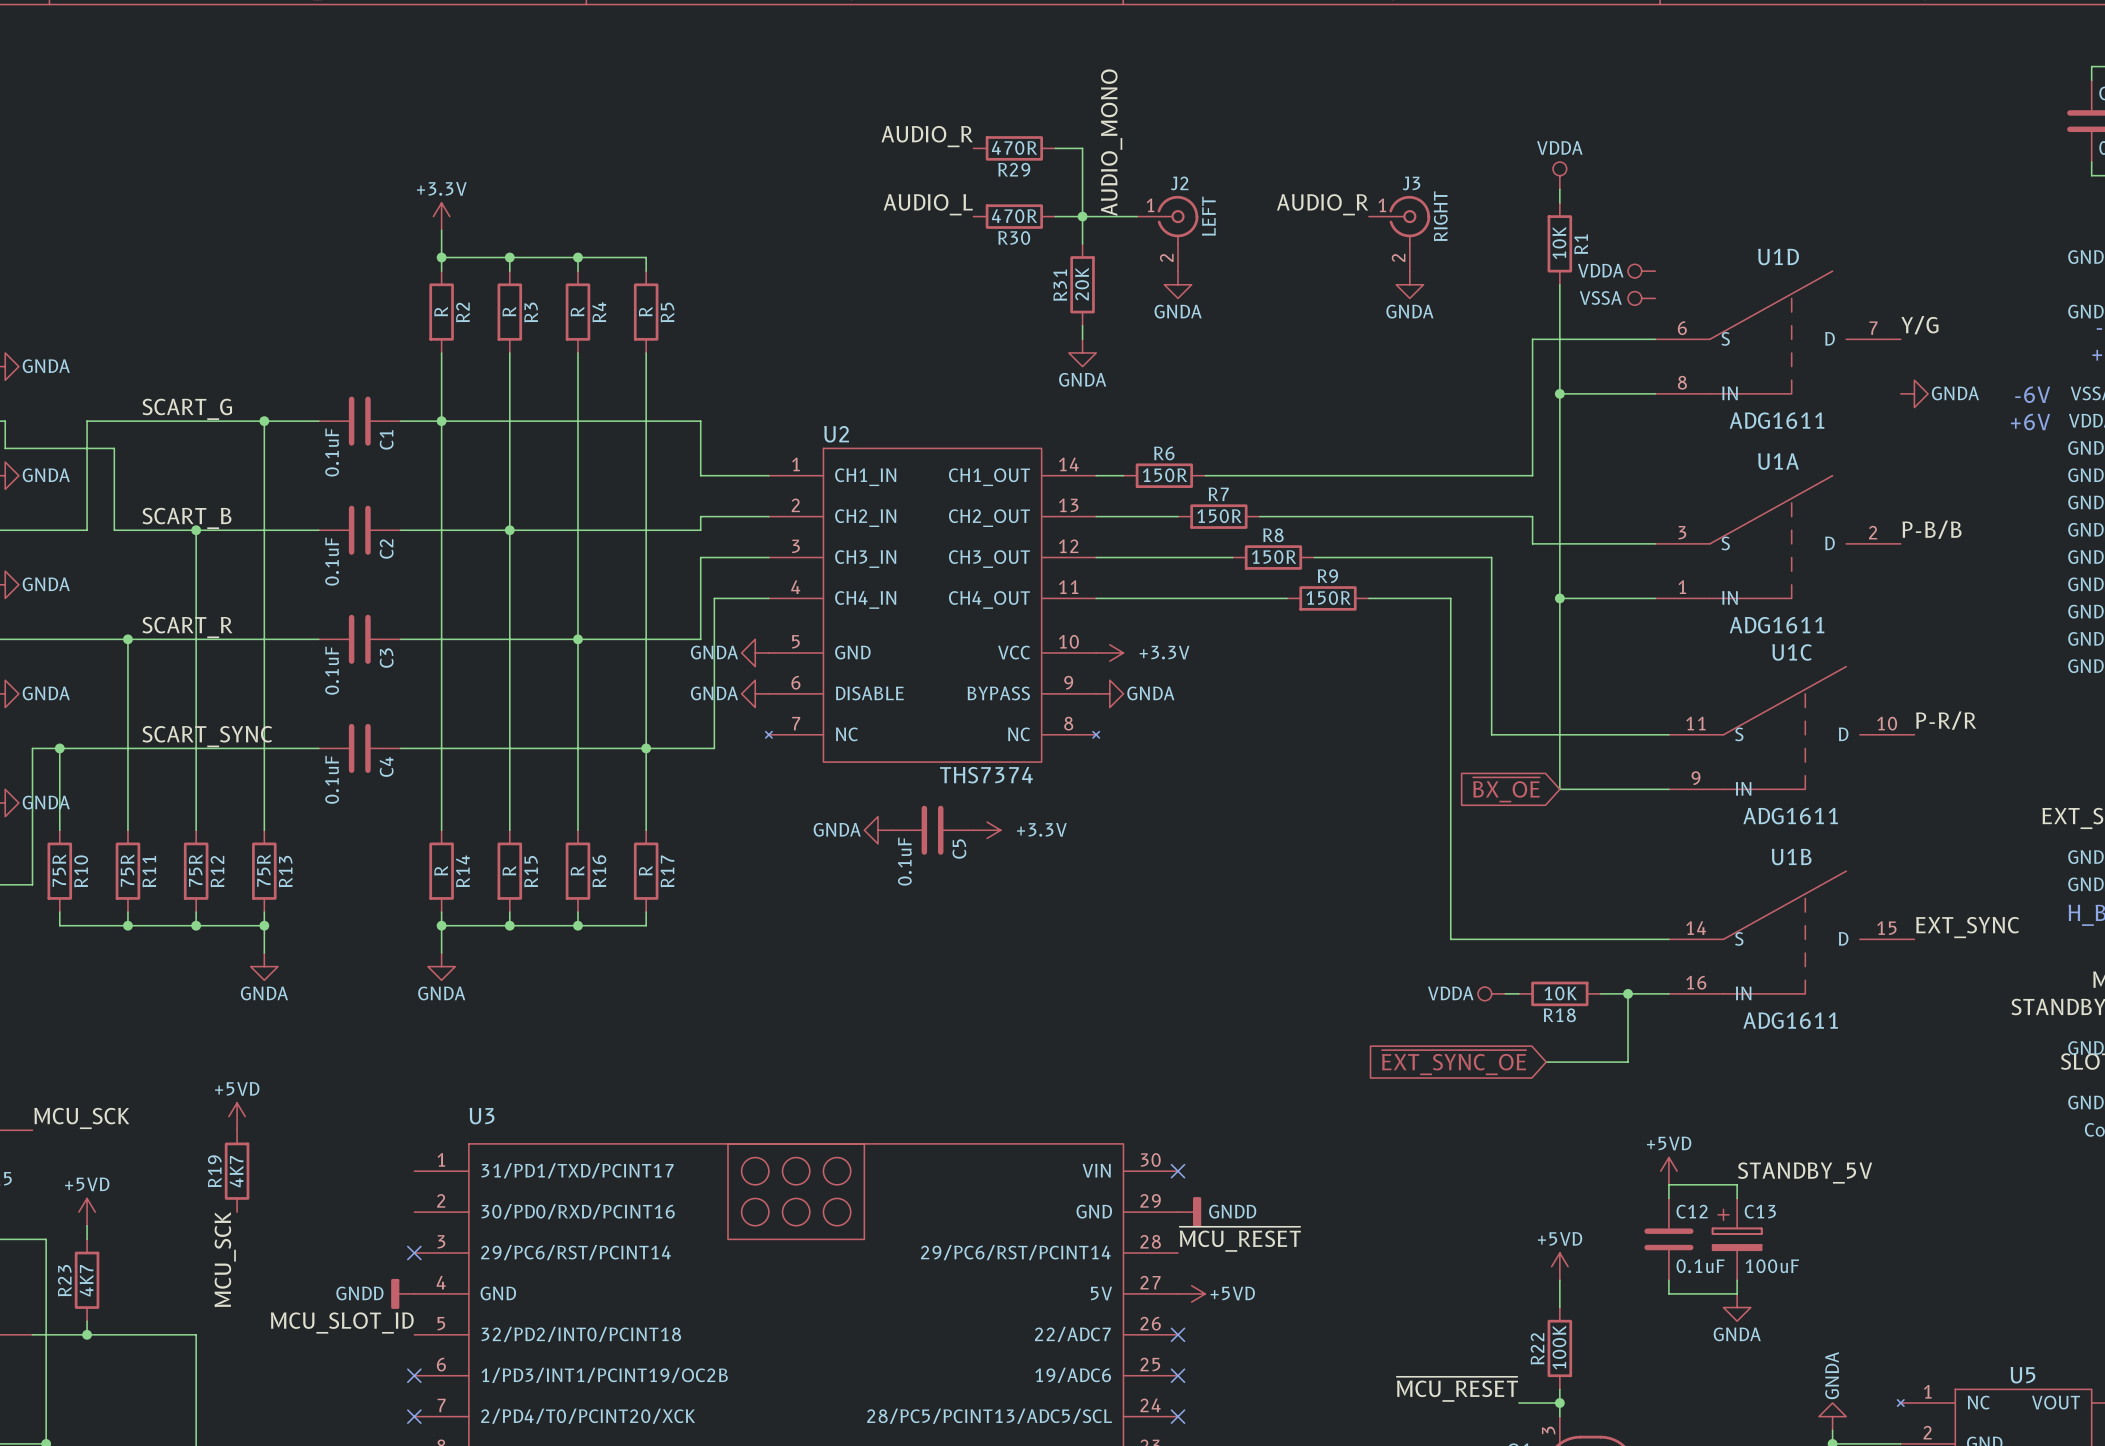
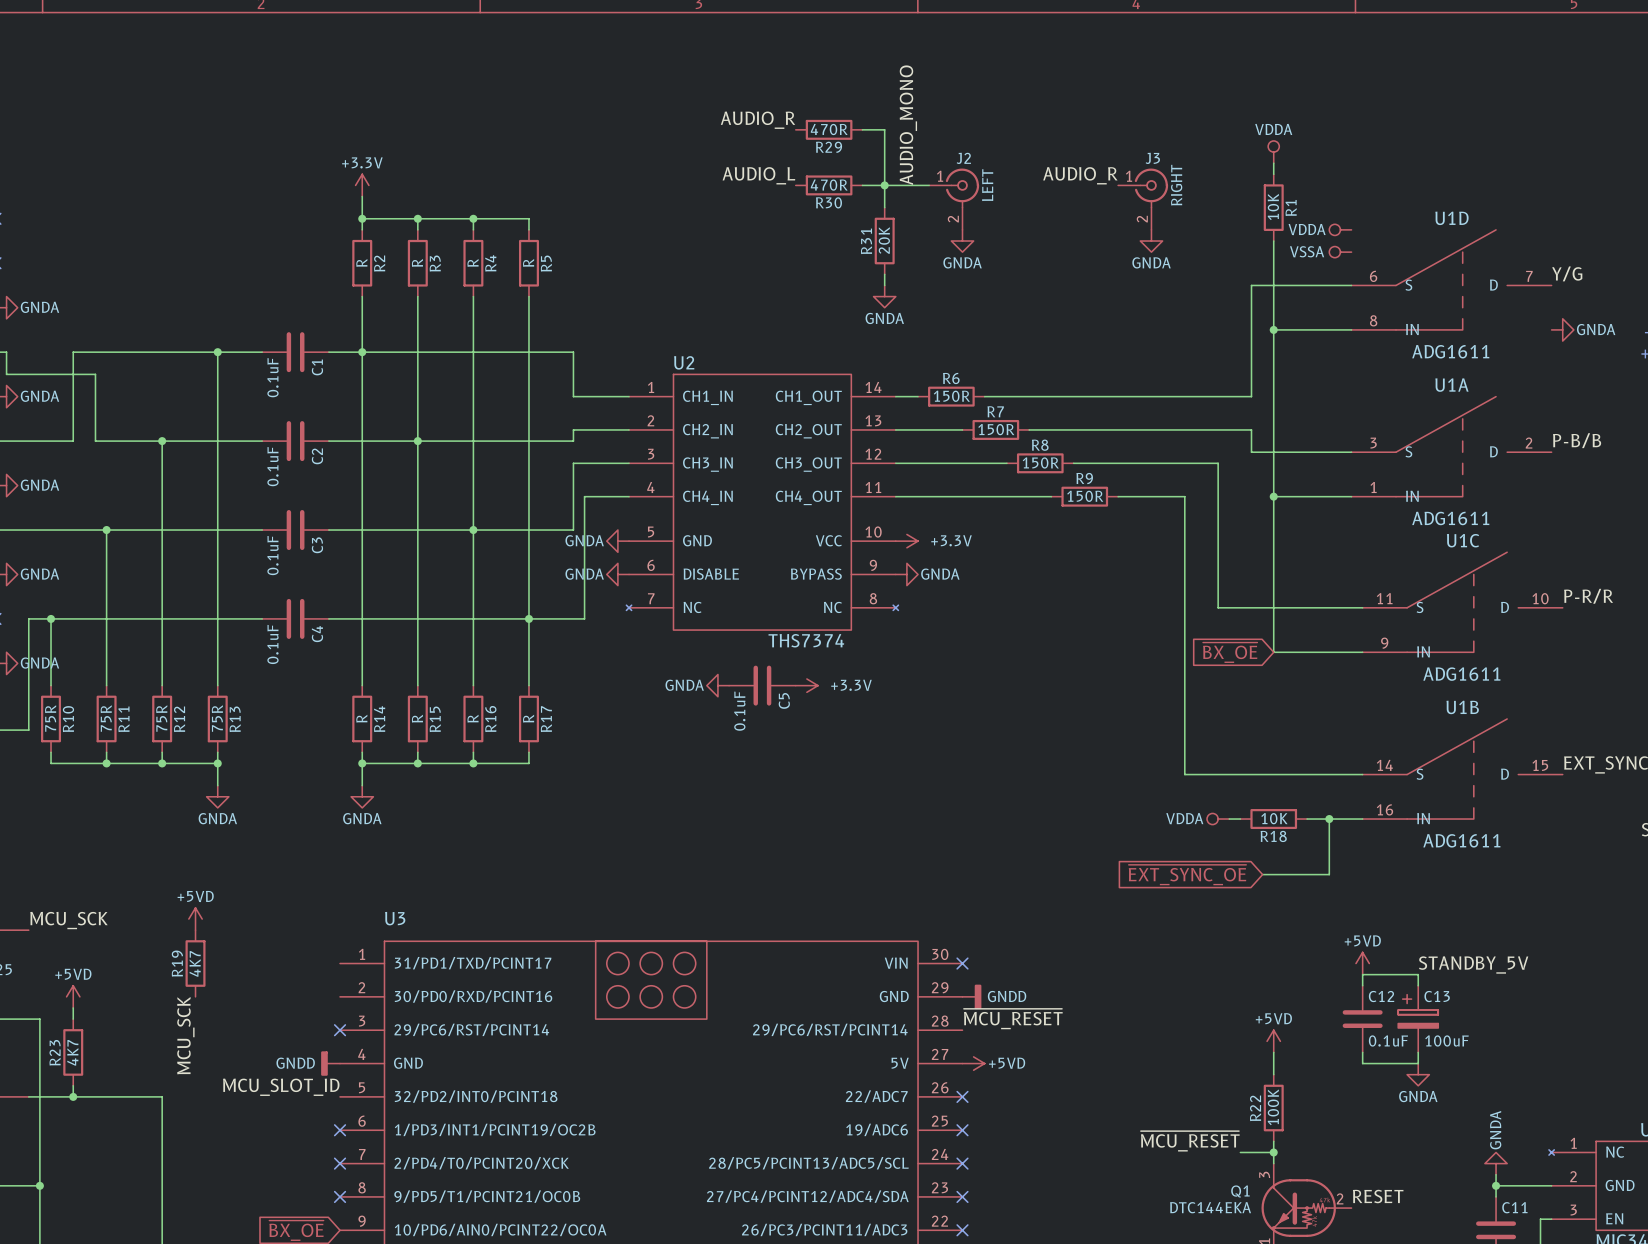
label: SCART_G (187, 409) -> none
label: SCART_B (186, 518) -> none
label: SCART_R (187, 627) -> none
label: SCART_SYNC (207, 736) -> none

